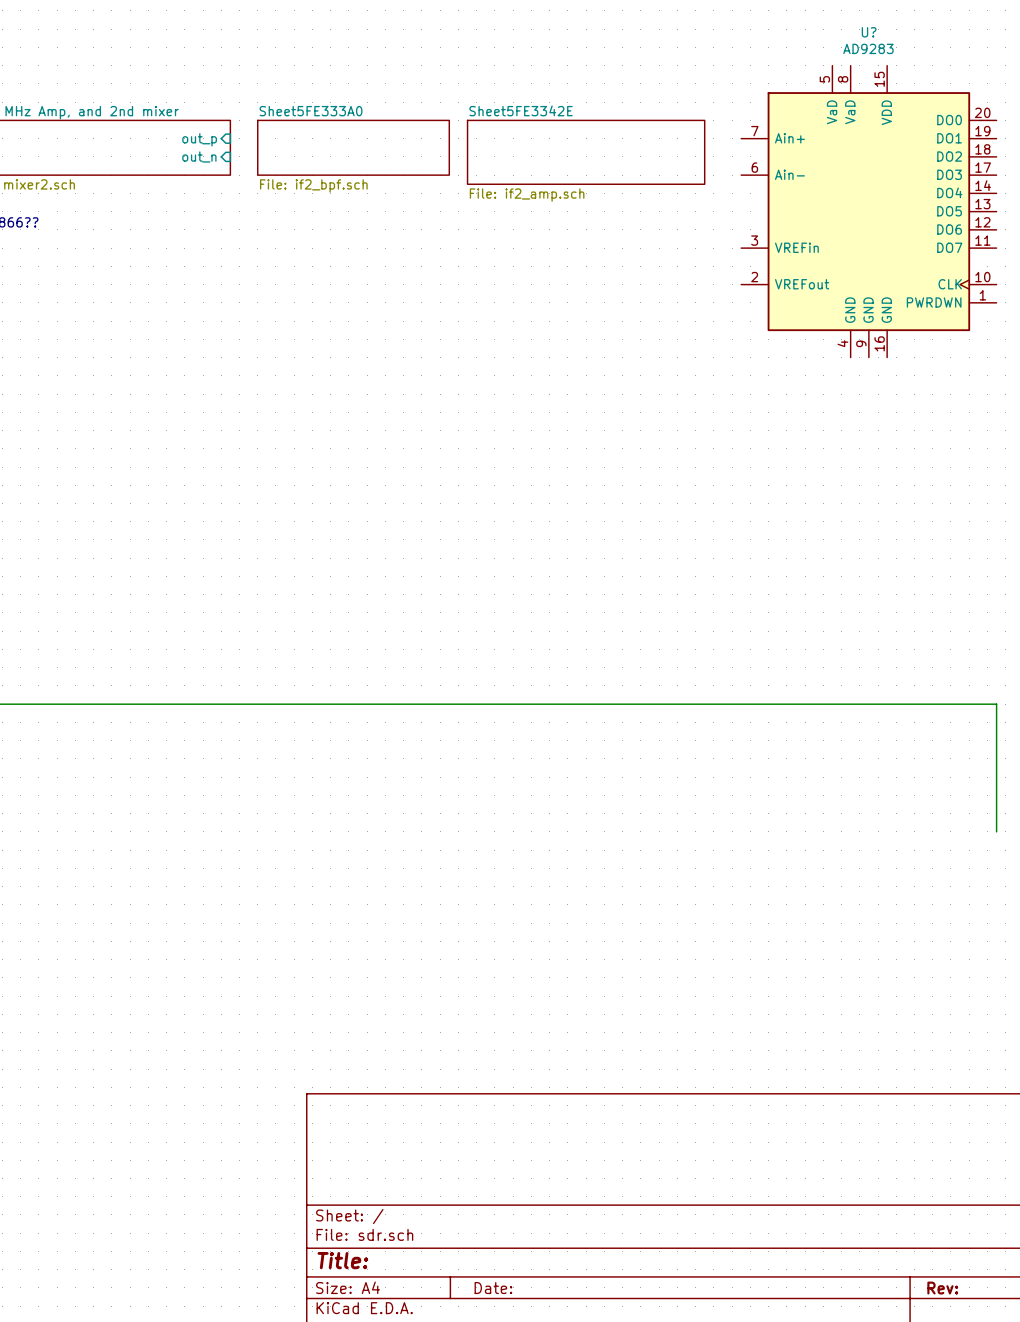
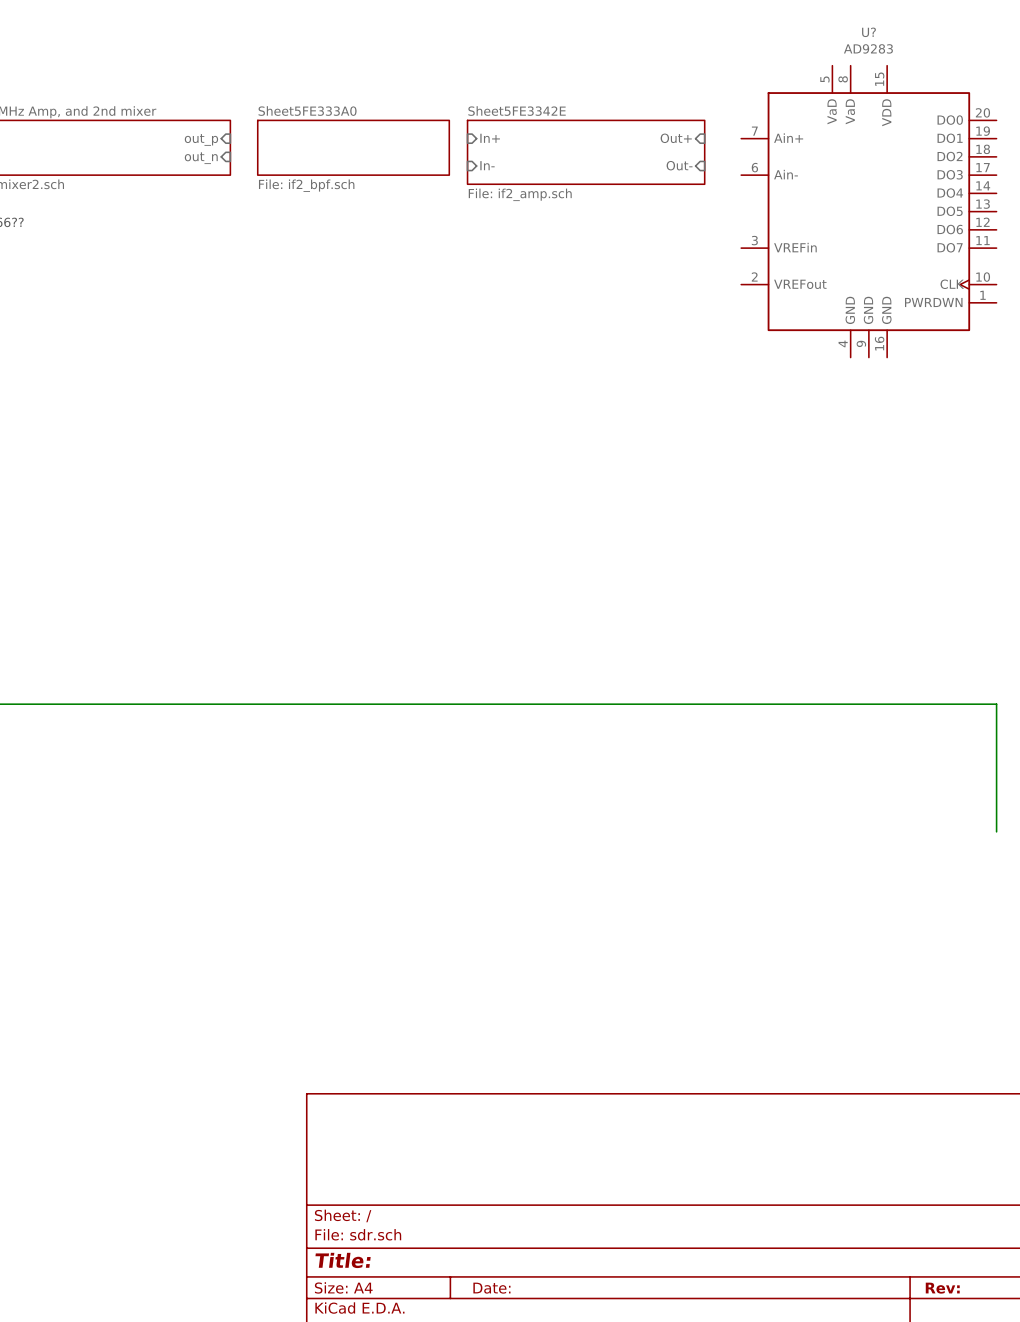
sheet pin: none -> In+ (490, 138)
sheet pin: none -> Out+ (676, 138)
sheet pin: none -> In- (487, 165)
sheet pin: none -> Out- (679, 165)

